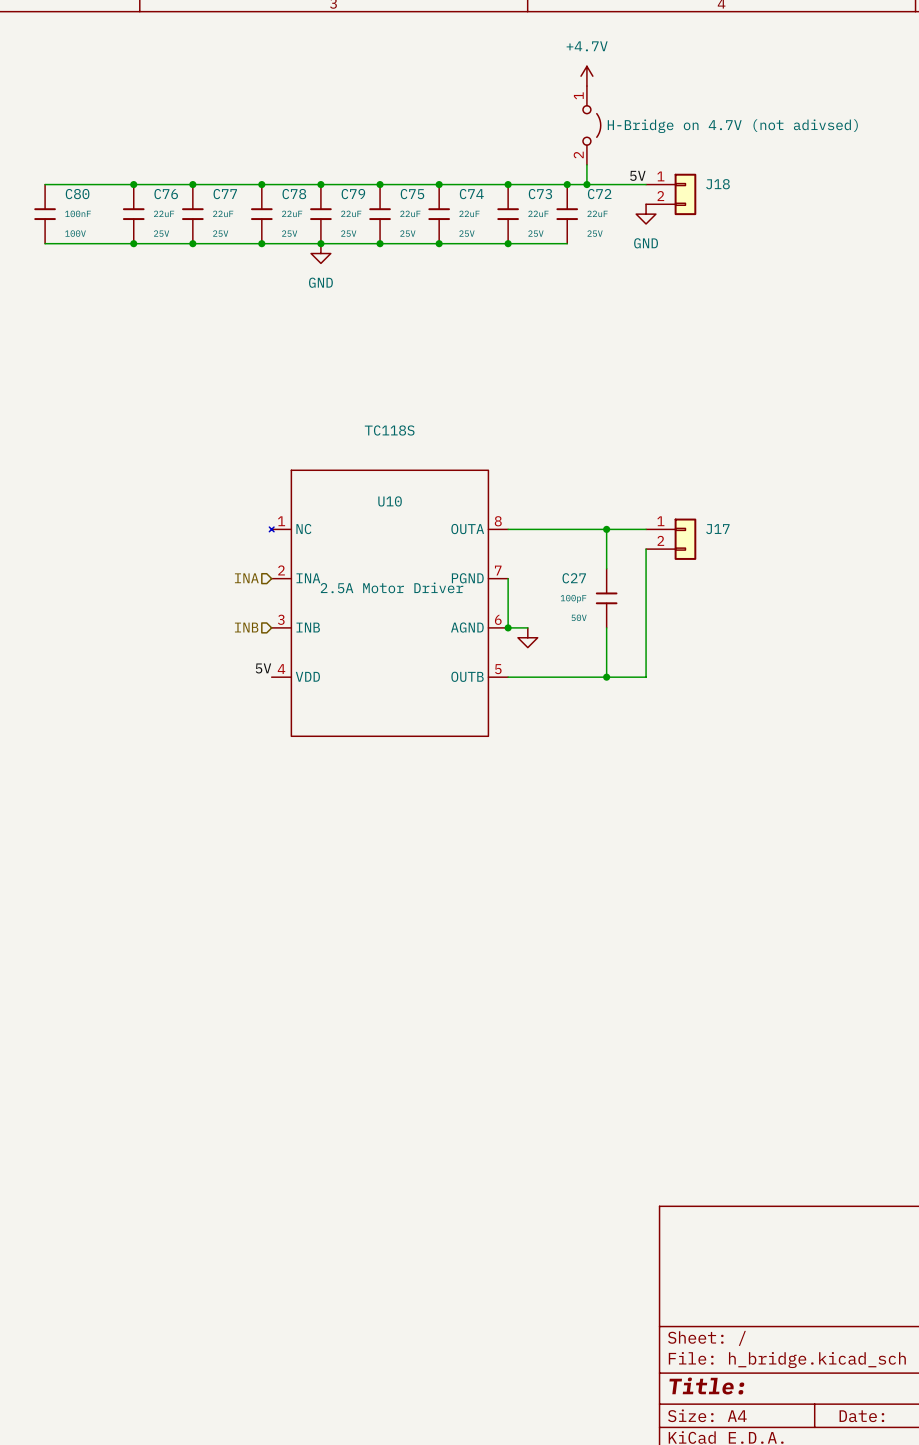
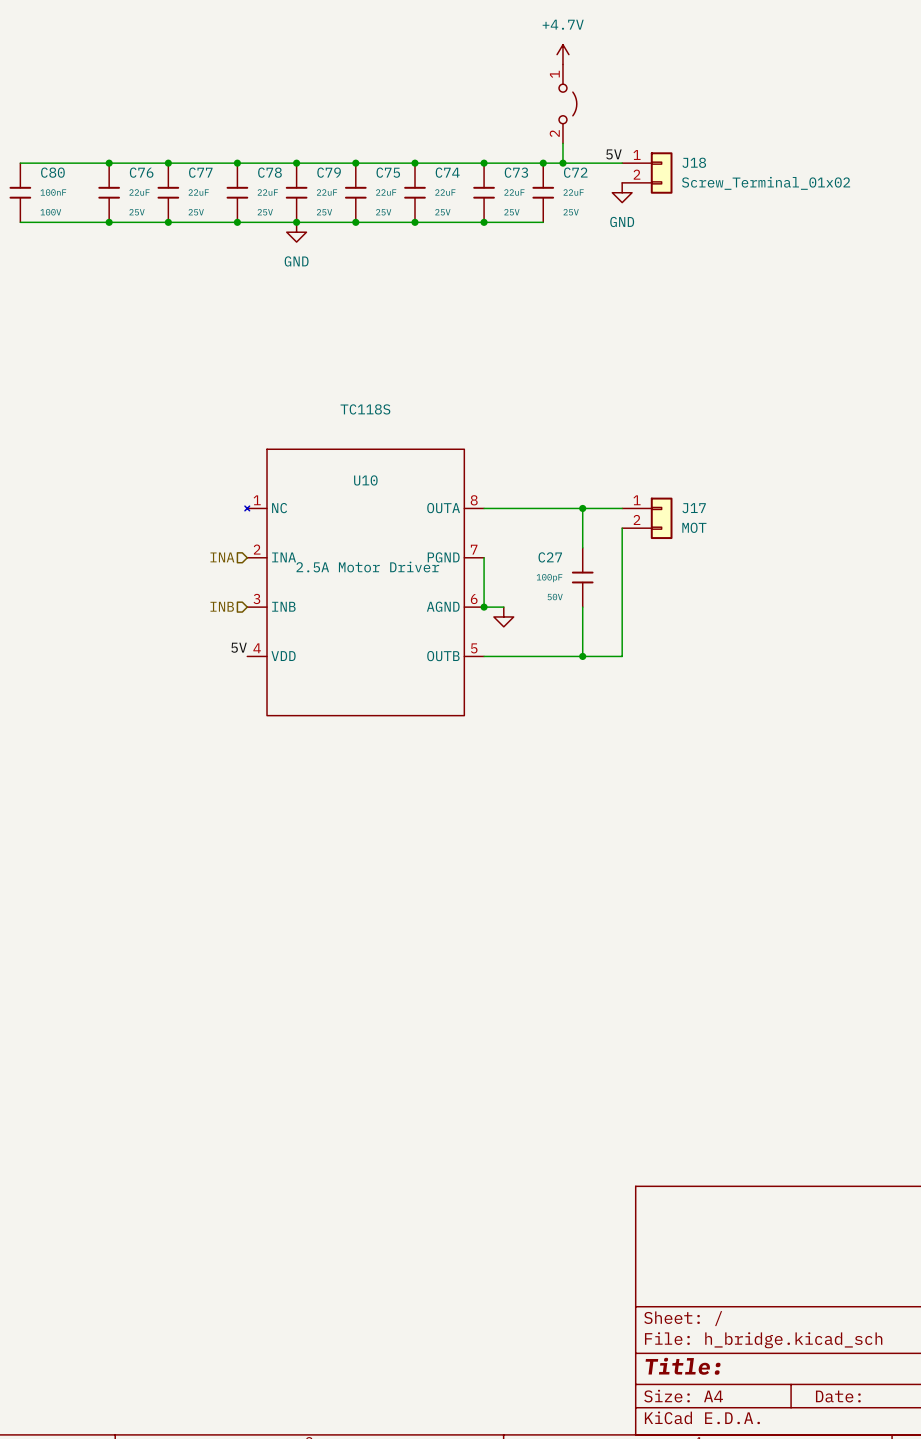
part value: H-Bridge on 4.7V (not adivsed) (732, 126) -> none
J18 value: none -> Screw_Terminal_01x02 (766, 183)
J17 value: none -> MOT (694, 527)

